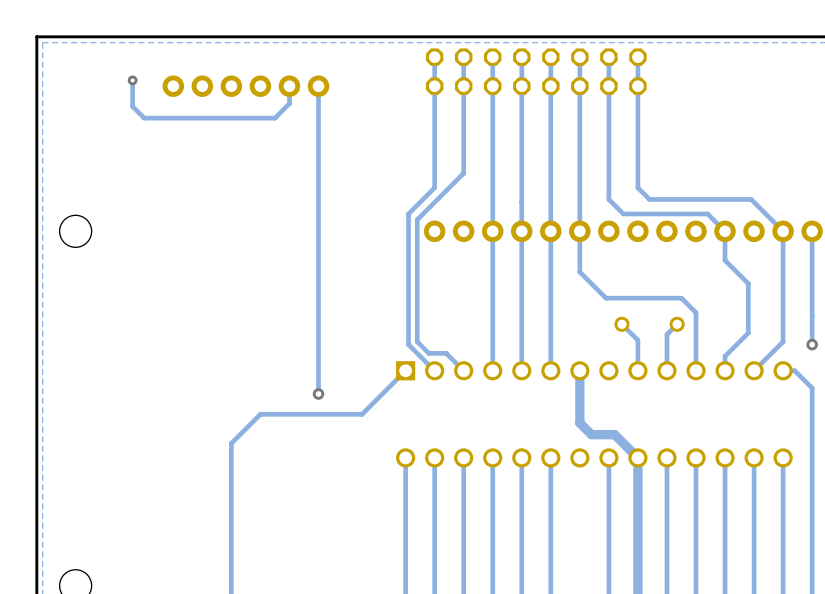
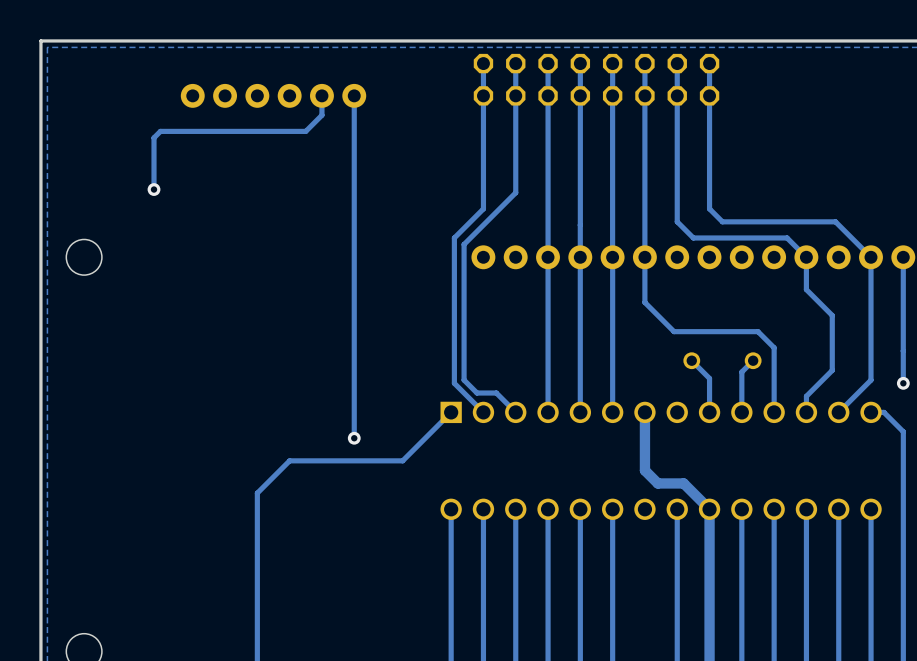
track: (132, 80) (132, 106) (144, 118) -> (154, 189) (154, 137) (160, 131)
via: (132, 80) -> none
via: none -> (154, 189)

